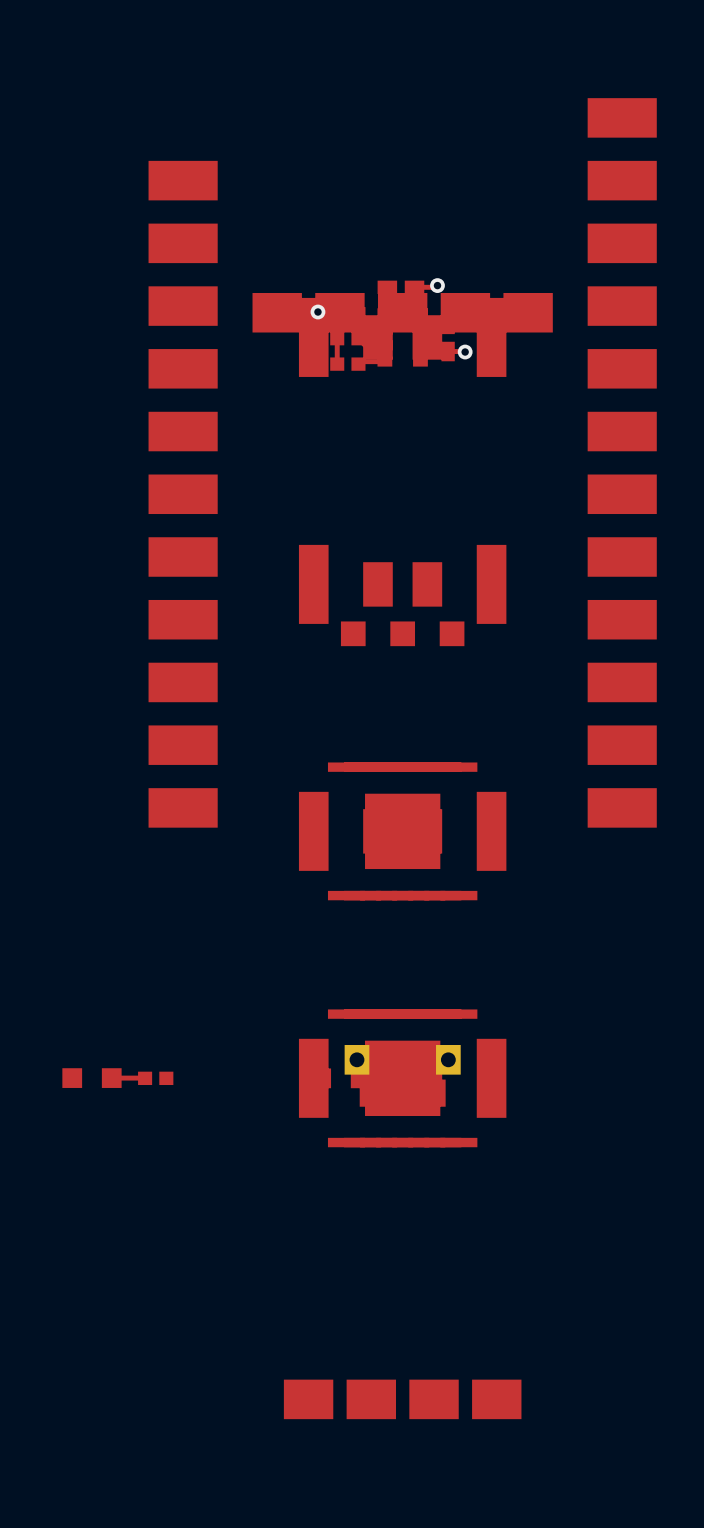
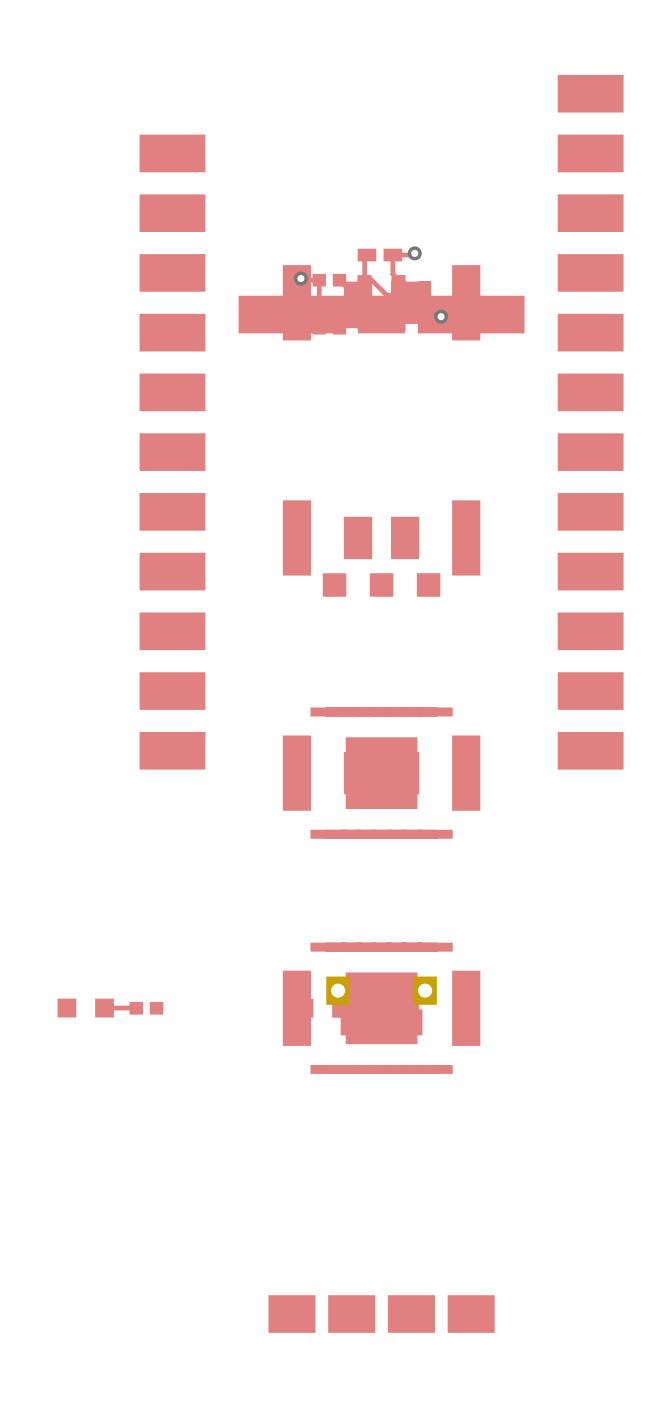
part position: (402, 312) -> (381, 314)

